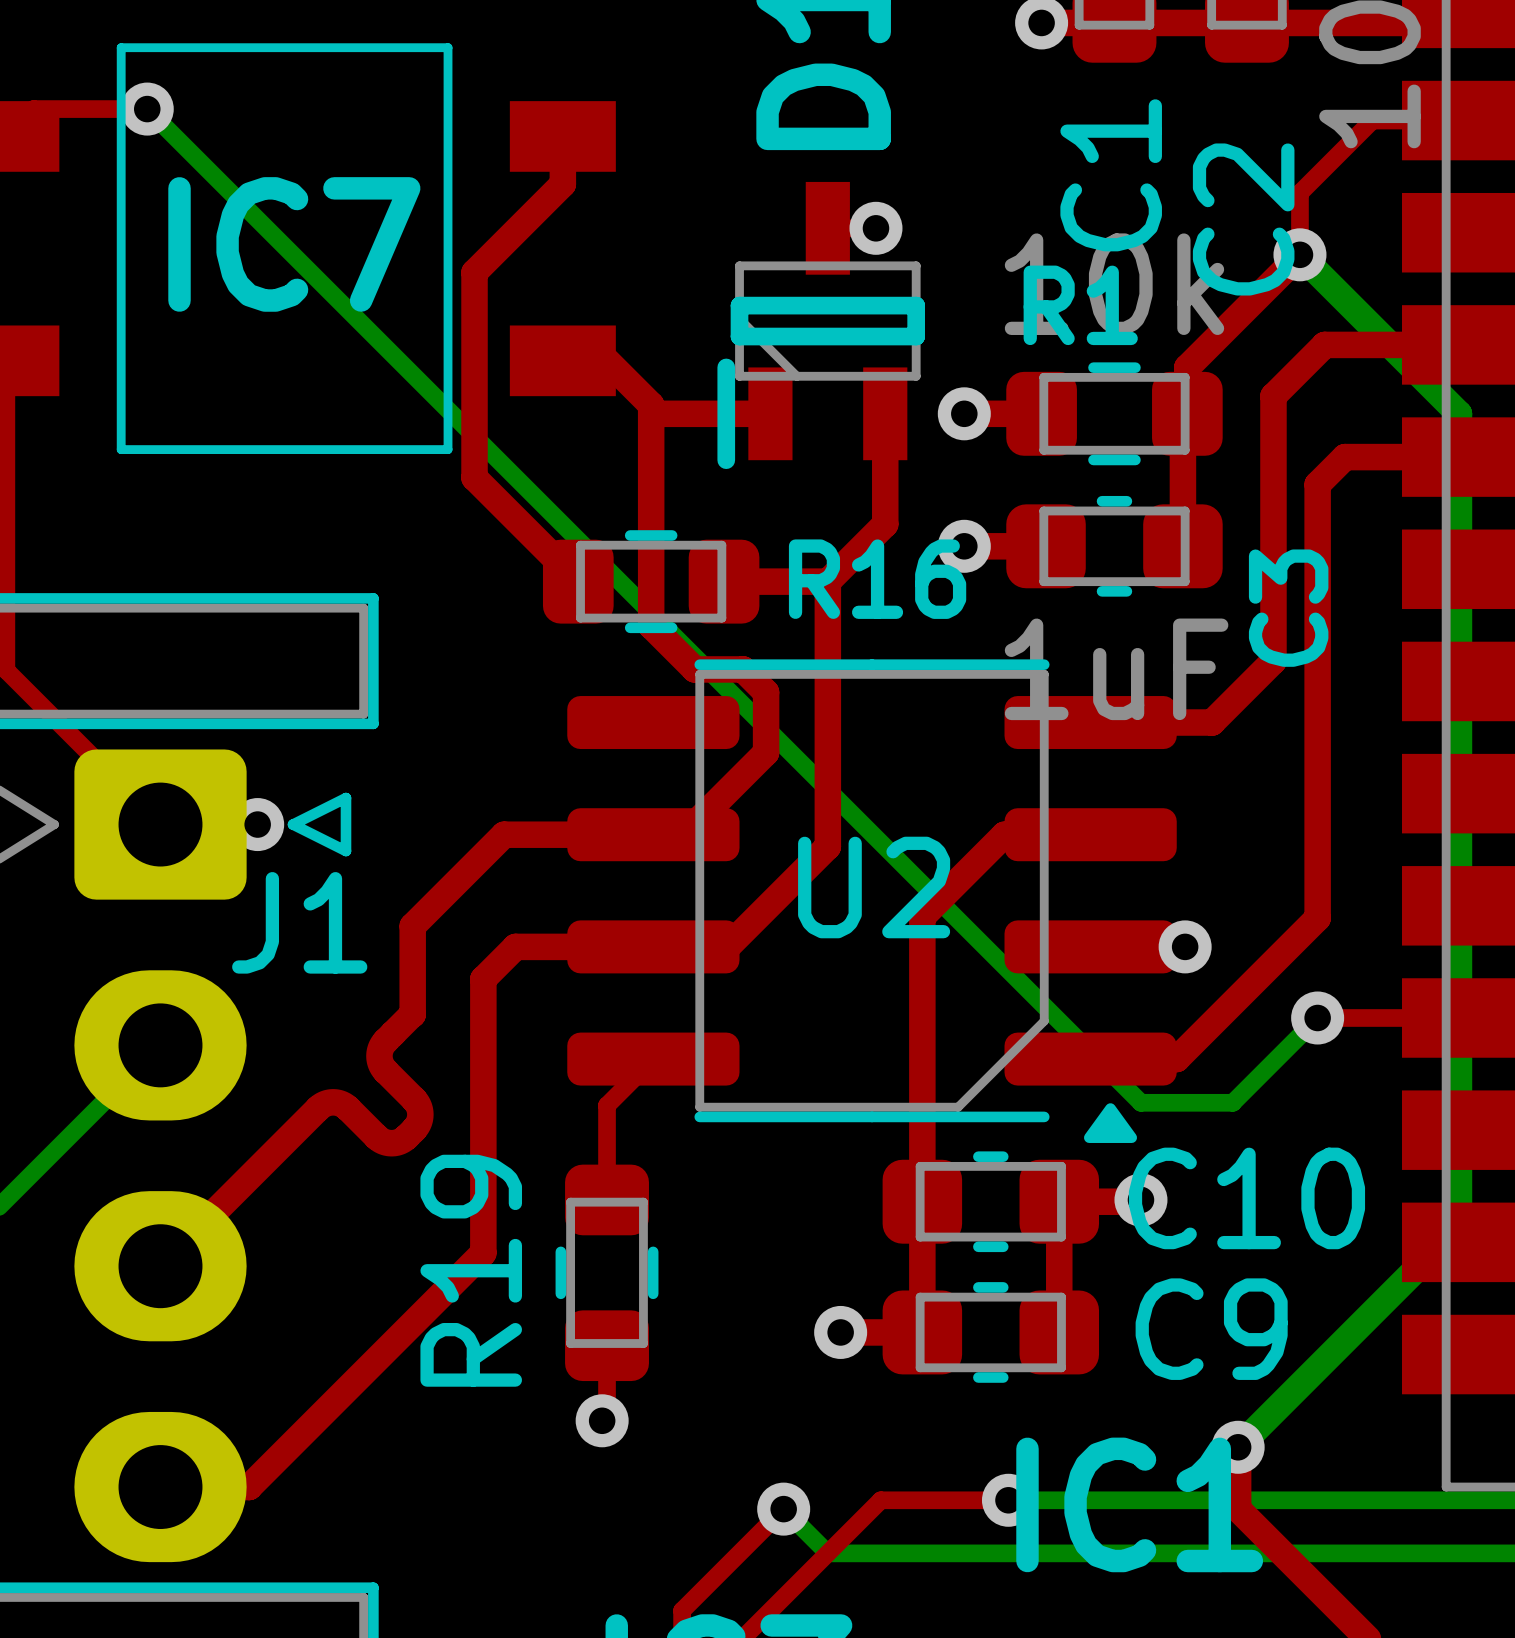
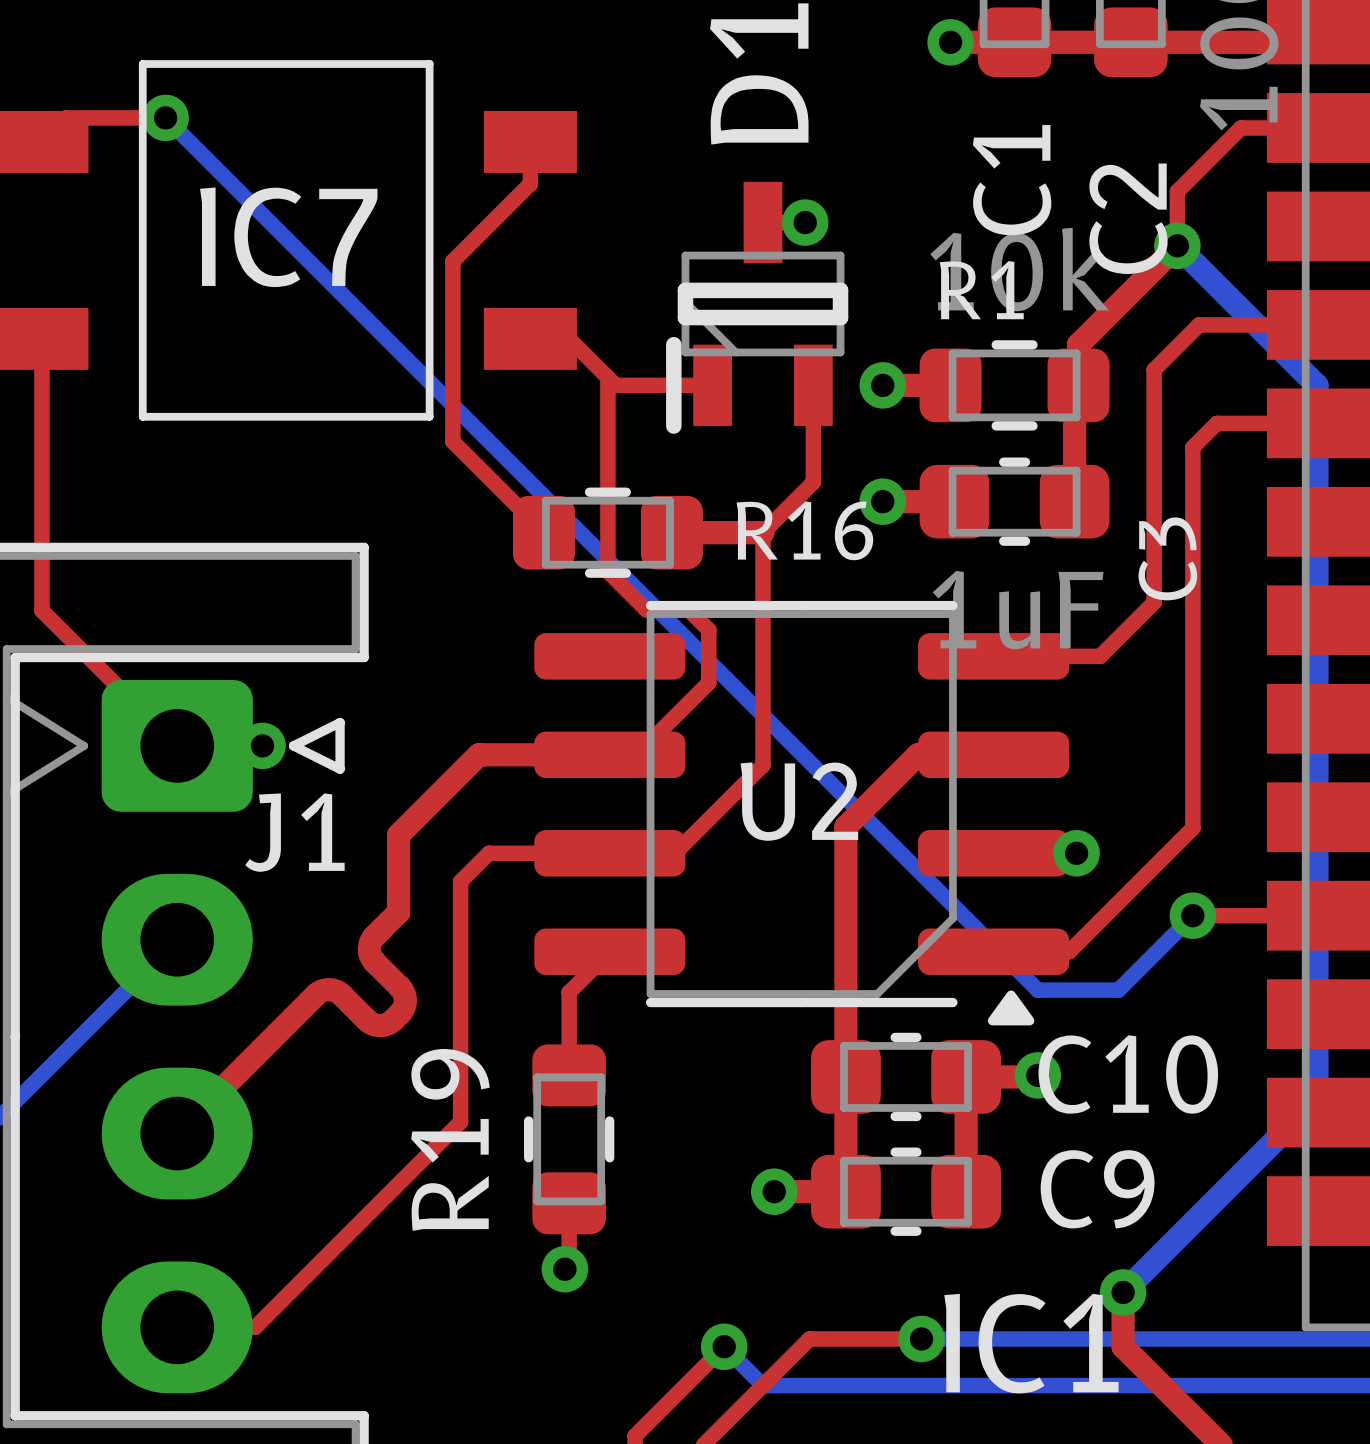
top track width: thick (562, 136) (562, 184) (474, 272) (474, 477) (578, 581) -> thin (530, 141) (530, 183) (452, 261) (452, 441) (543, 532)
top track width: thick (1468, 344) (1324, 344) (1273, 396) (1273, 661) (1212, 722) (1090, 722) -> thin (1325, 324) (1199, 324) (1154, 369) (1154, 602) (1100, 656) (993, 656)
top track width: thick (607, 360) (651, 404) (651, 625) (694, 669) (743, 669) (766, 692) (766, 752) (684, 834) (653, 834) -> thin (569, 338) (607, 377) (607, 571) (646, 609) (688, 609) (708, 629) (708, 682) (636, 754) (609, 754)
top track width: thick (660, 413) (770, 413) -> thin (615, 385) (712, 385)
top track width: thick (885, 413) (885, 524) (827, 581) (827, 846) (727, 946) (515, 946) (483, 979) (483, 1252) (249, 1487) (160, 1487) -> thin (813, 385) (813, 482) (762, 532) (762, 765) (674, 853) (488, 853) (460, 881) (460, 1121) (255, 1327) (177, 1327)
top track width: thick (1468, 457) (1345, 457) (1317, 484) (1317, 918) (1176, 1059) (1090, 1059) -> thin (1325, 423) (1216, 423) (1192, 447) (1192, 828) (1069, 951) (993, 951)

